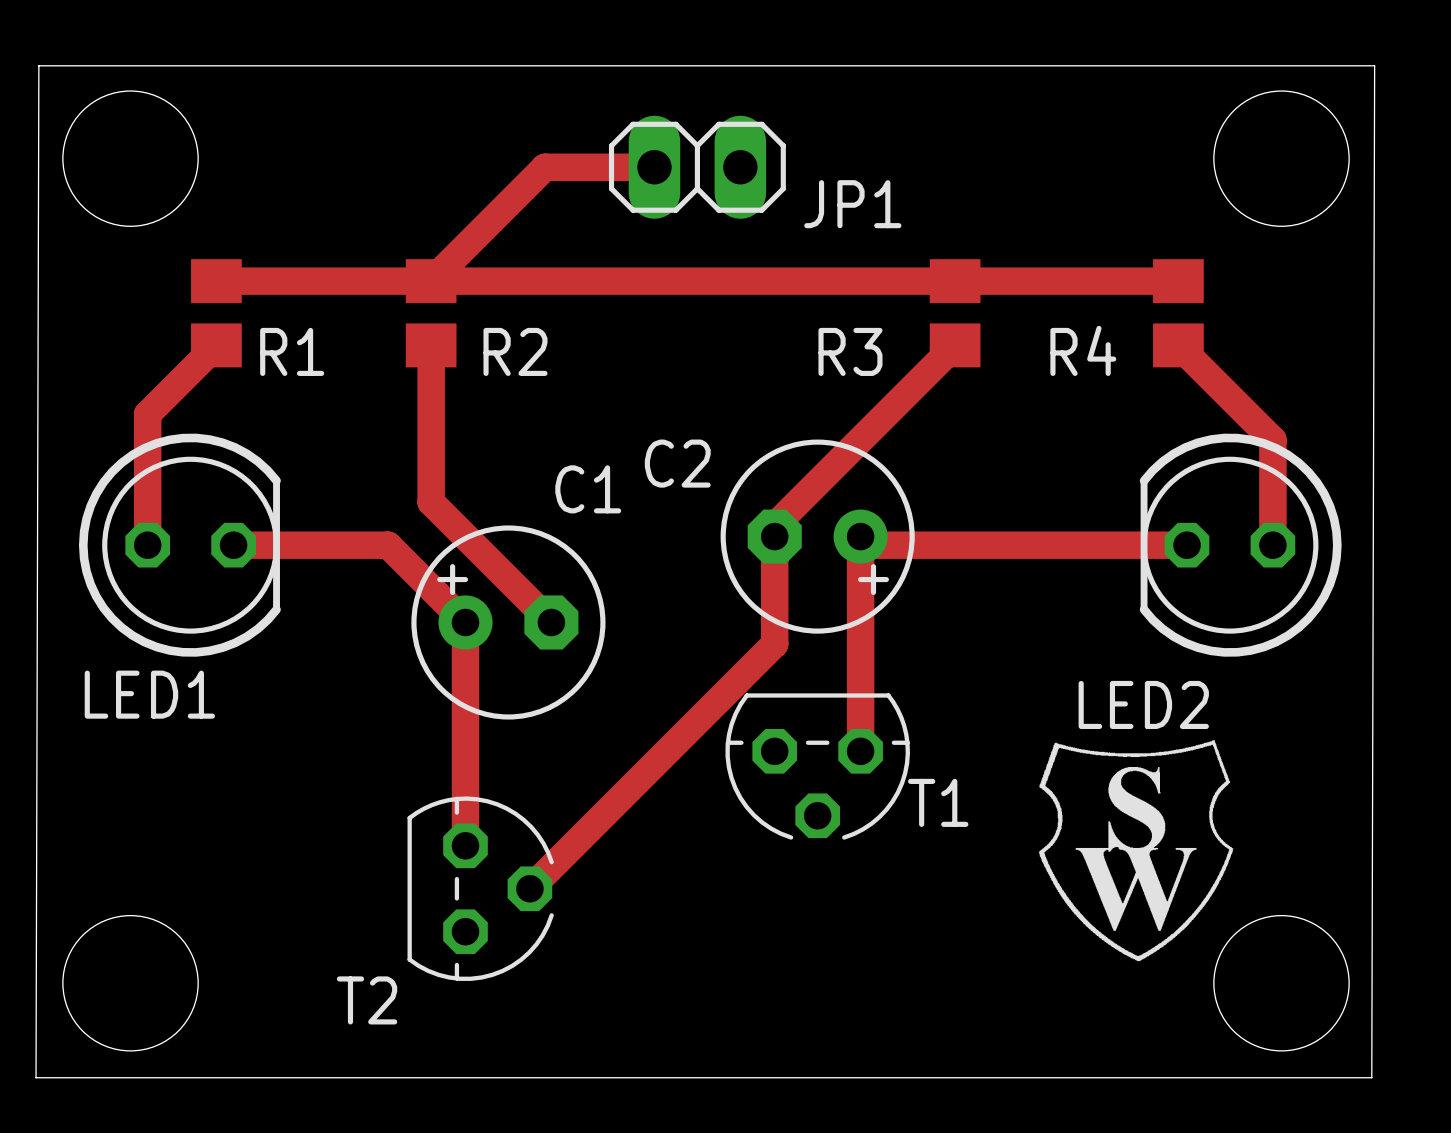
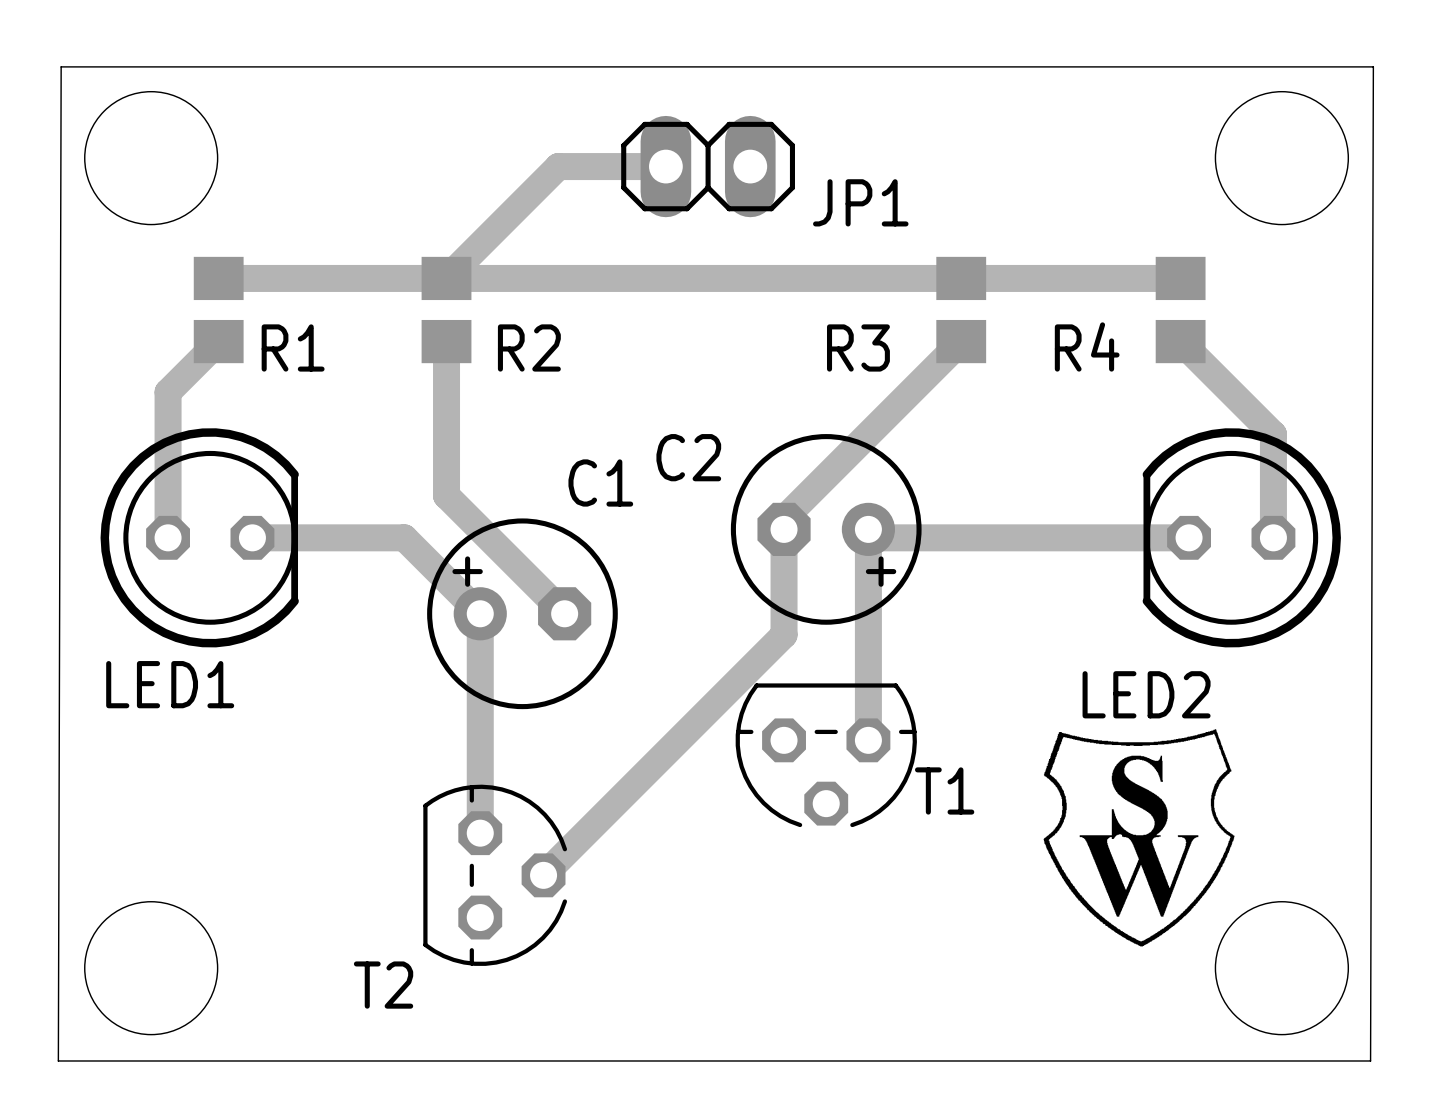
R1 position: (216, 313) -> (218, 310)
track: (216, 345) (147, 414) -> (218, 341) (168, 392) (168, 409)

